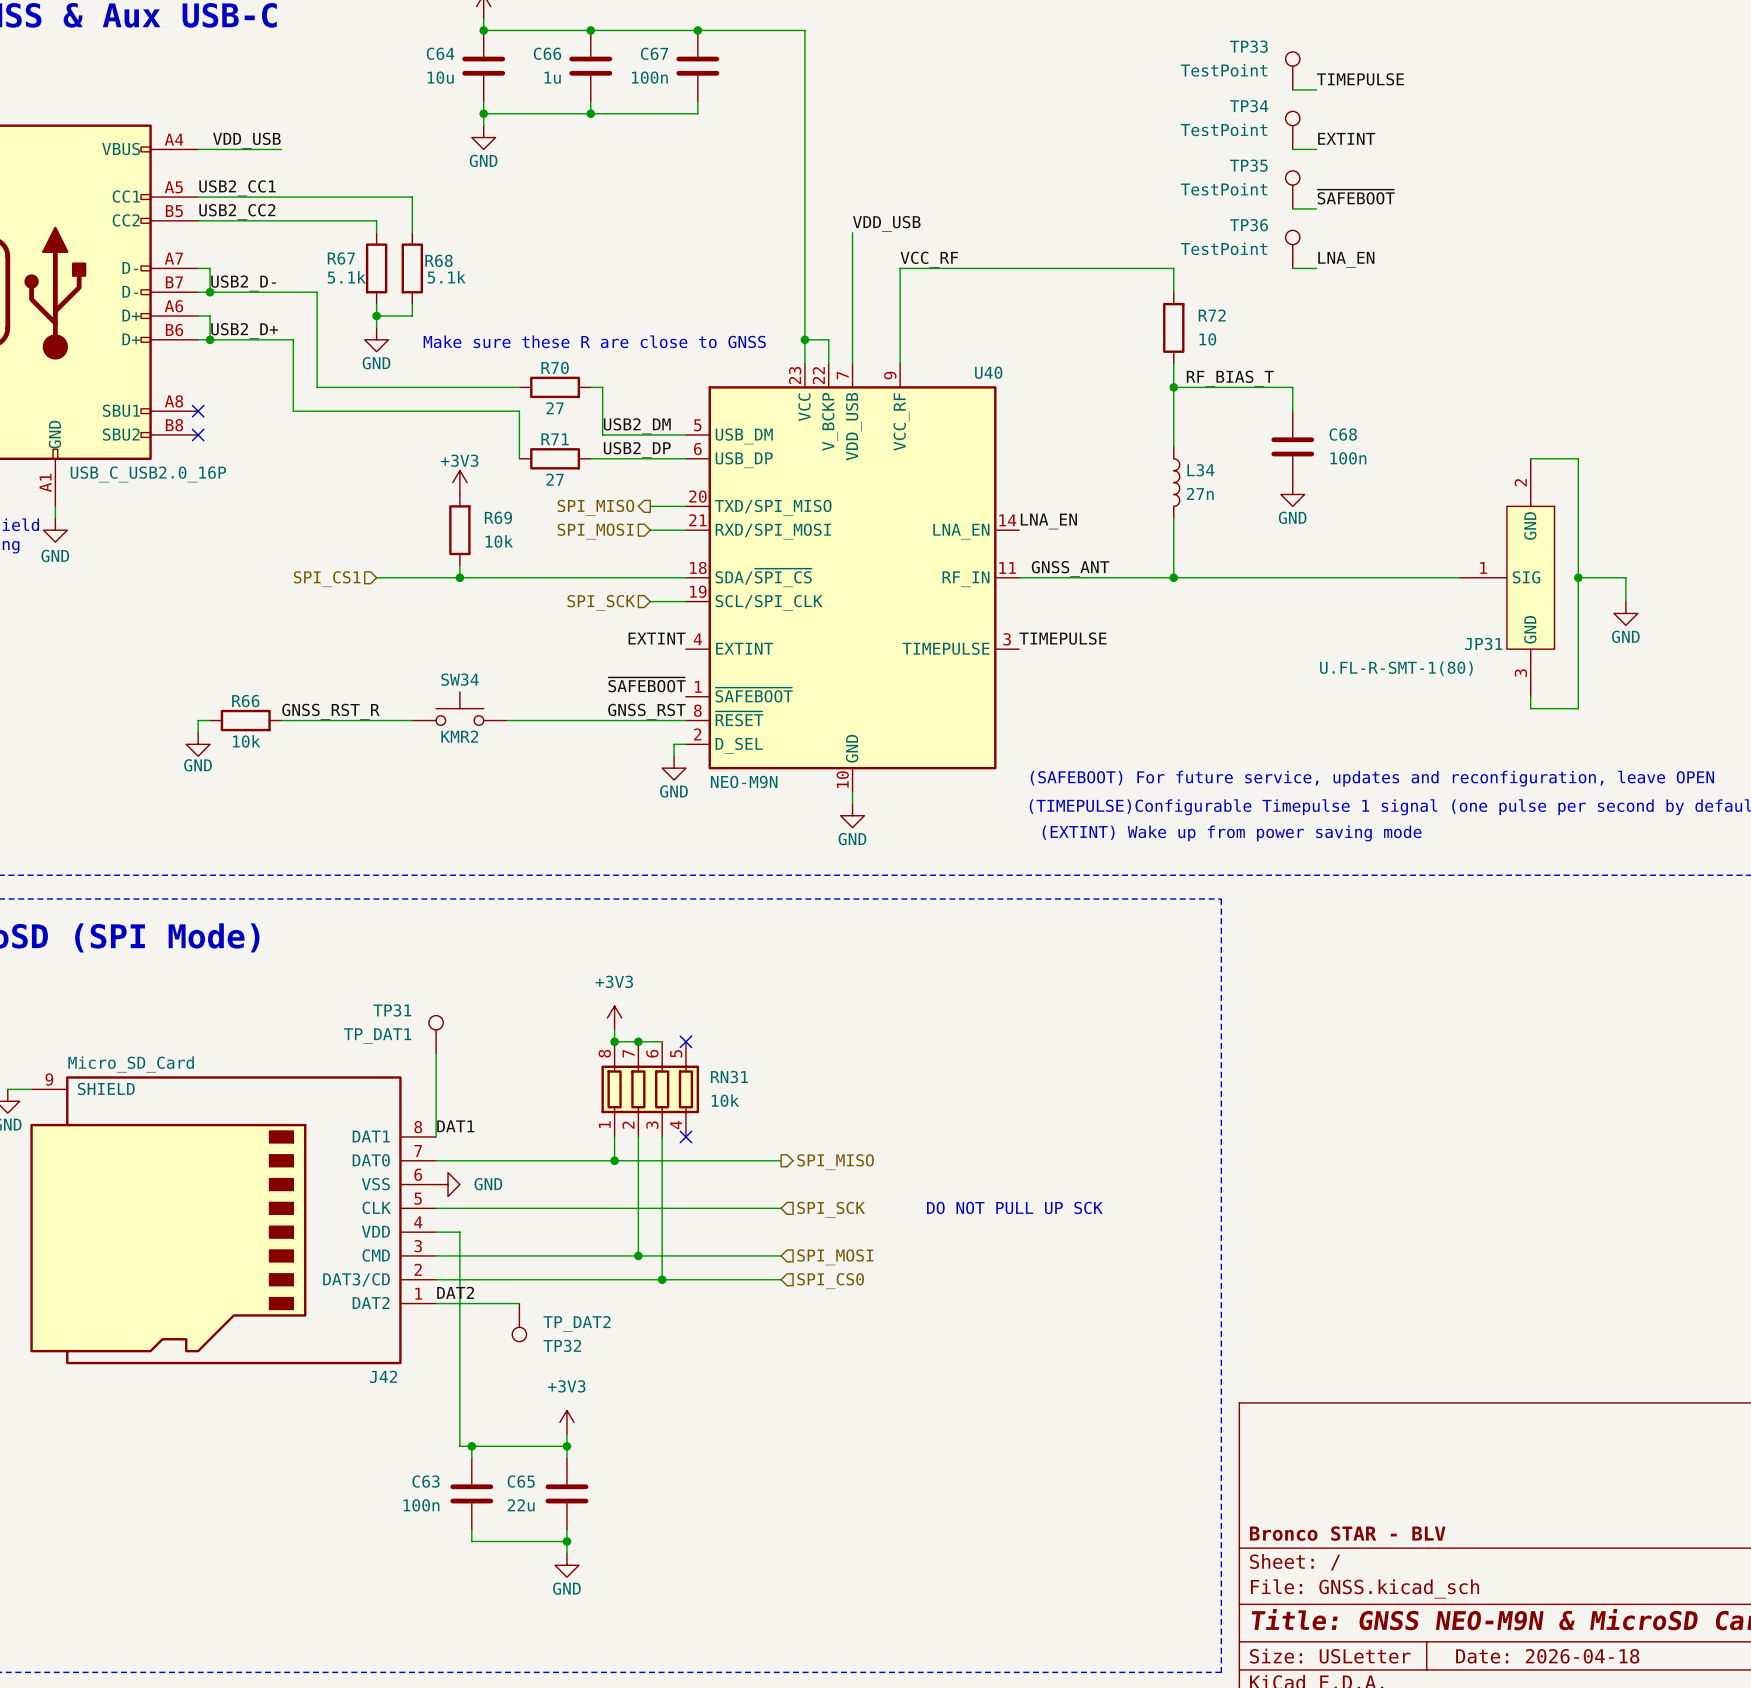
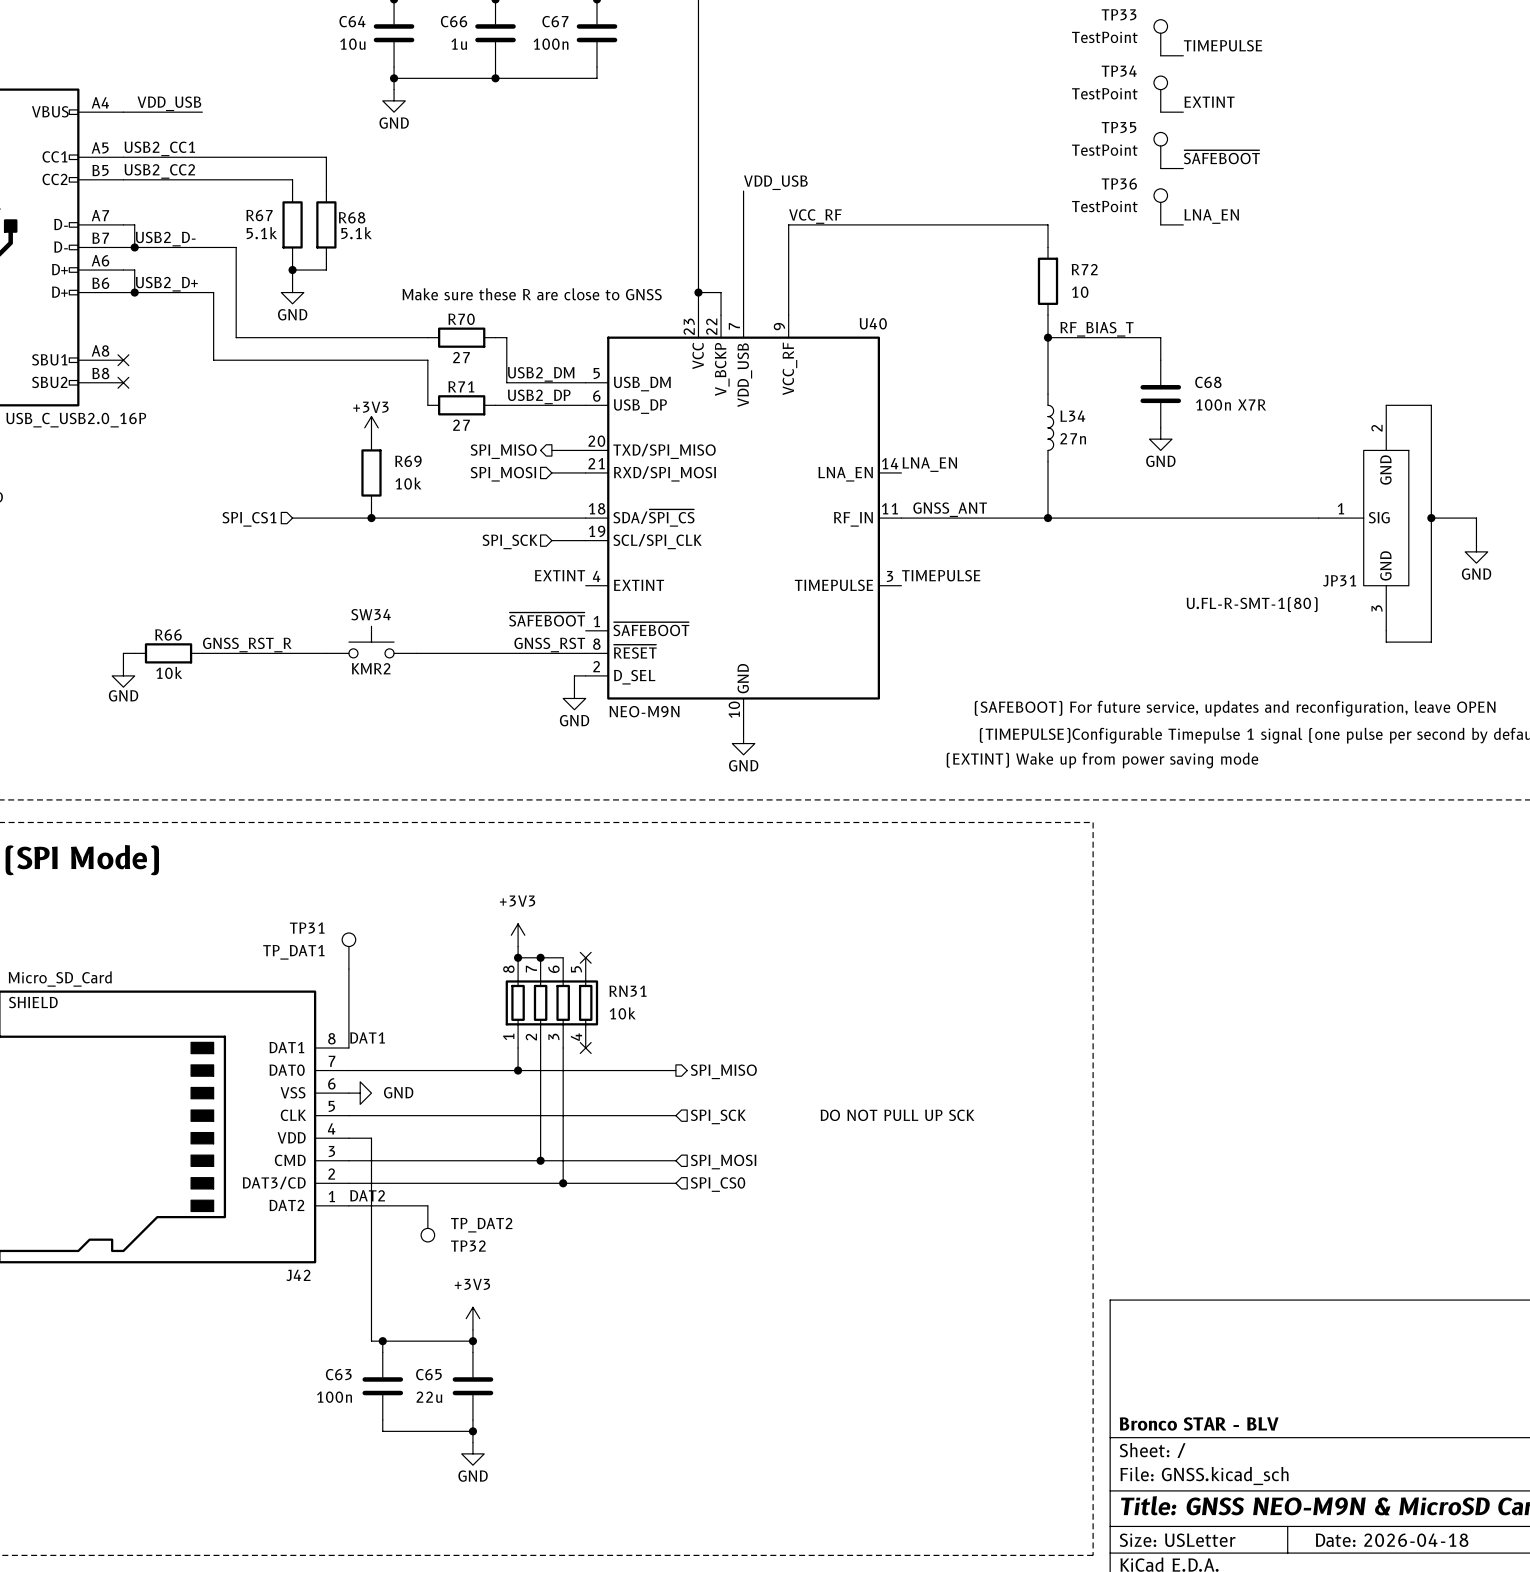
C68 value: 100n (1348, 458) -> 100n X7R (1231, 404)

